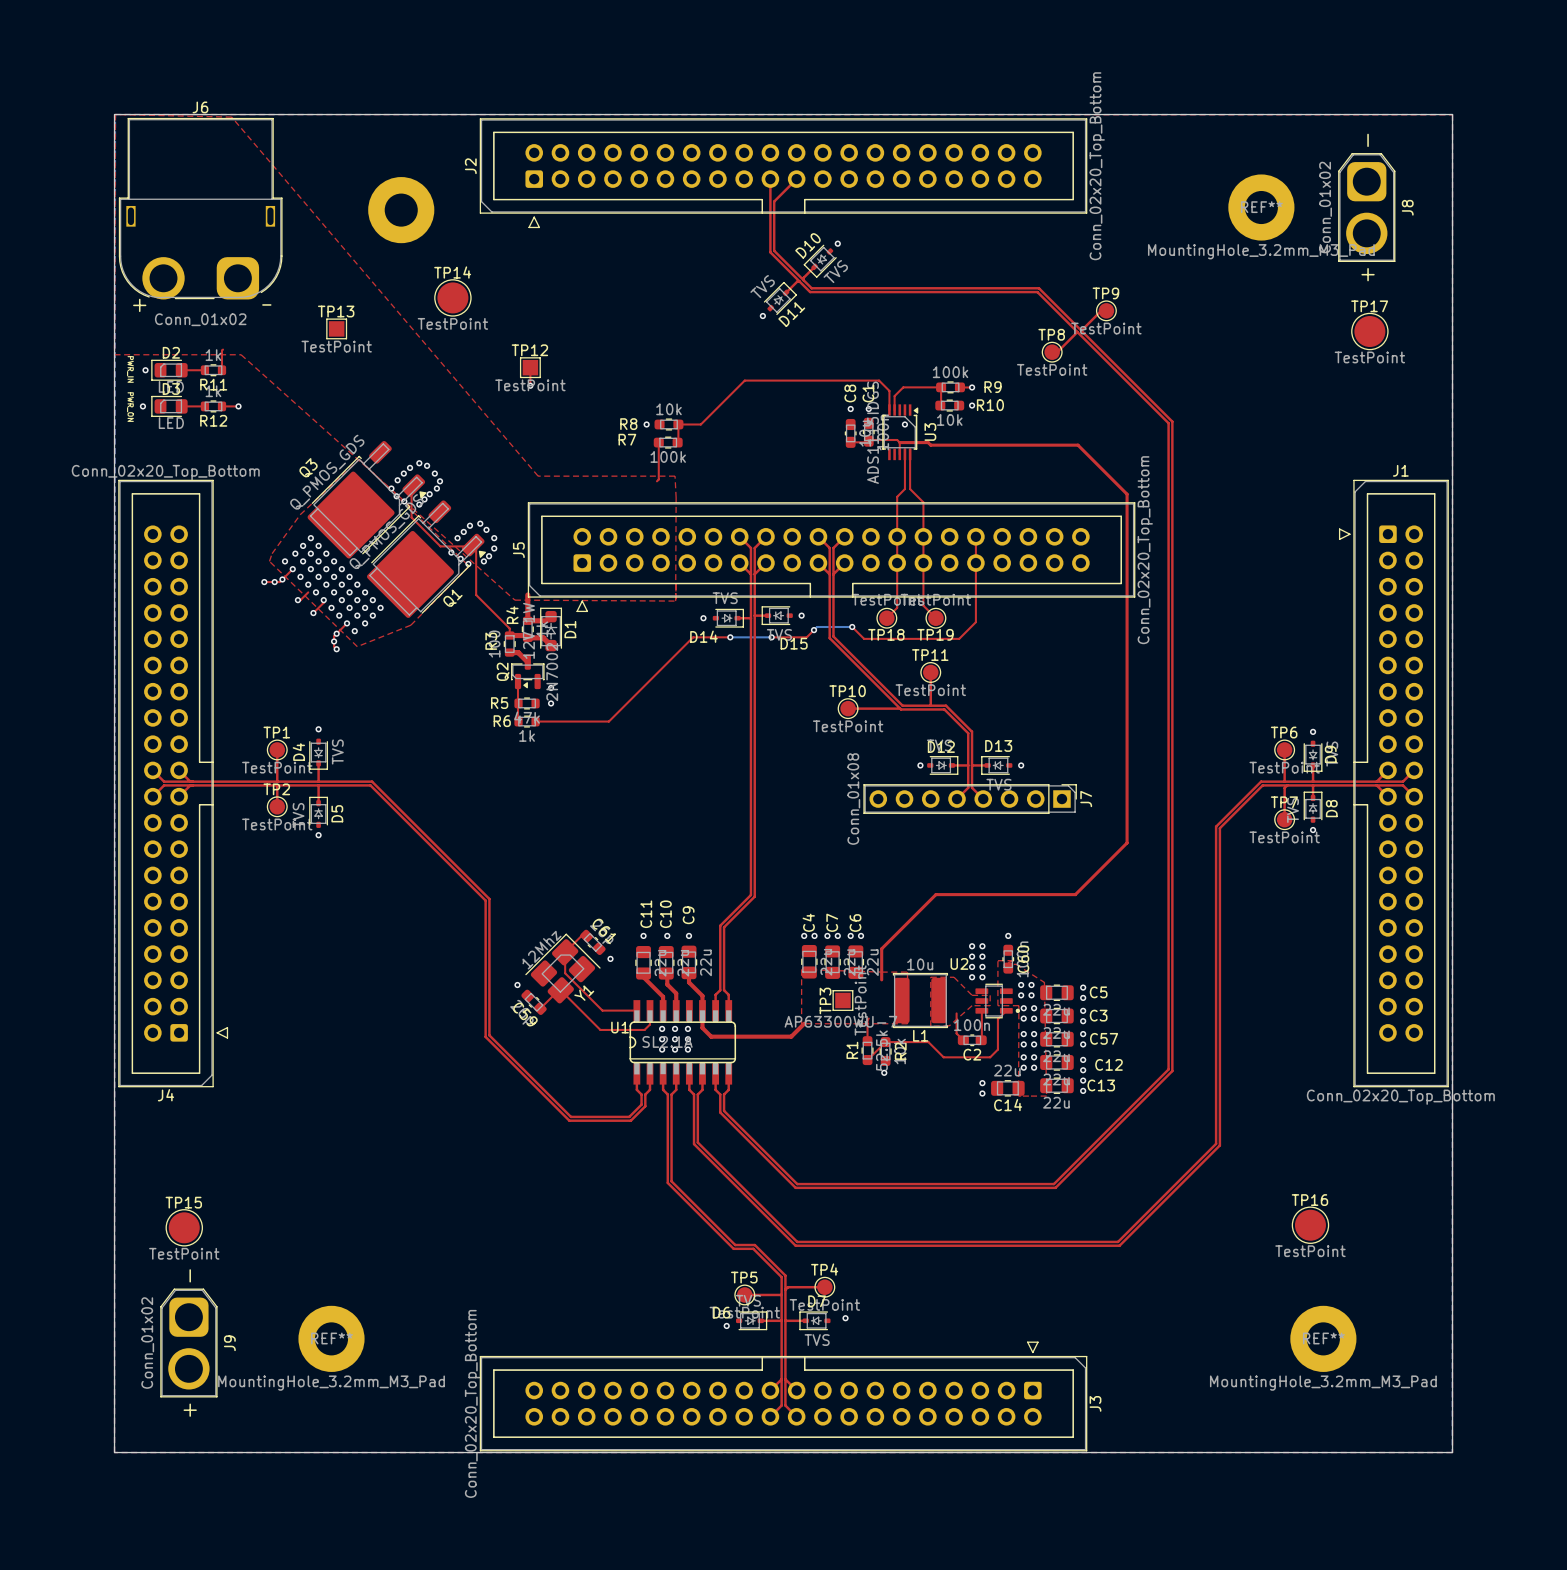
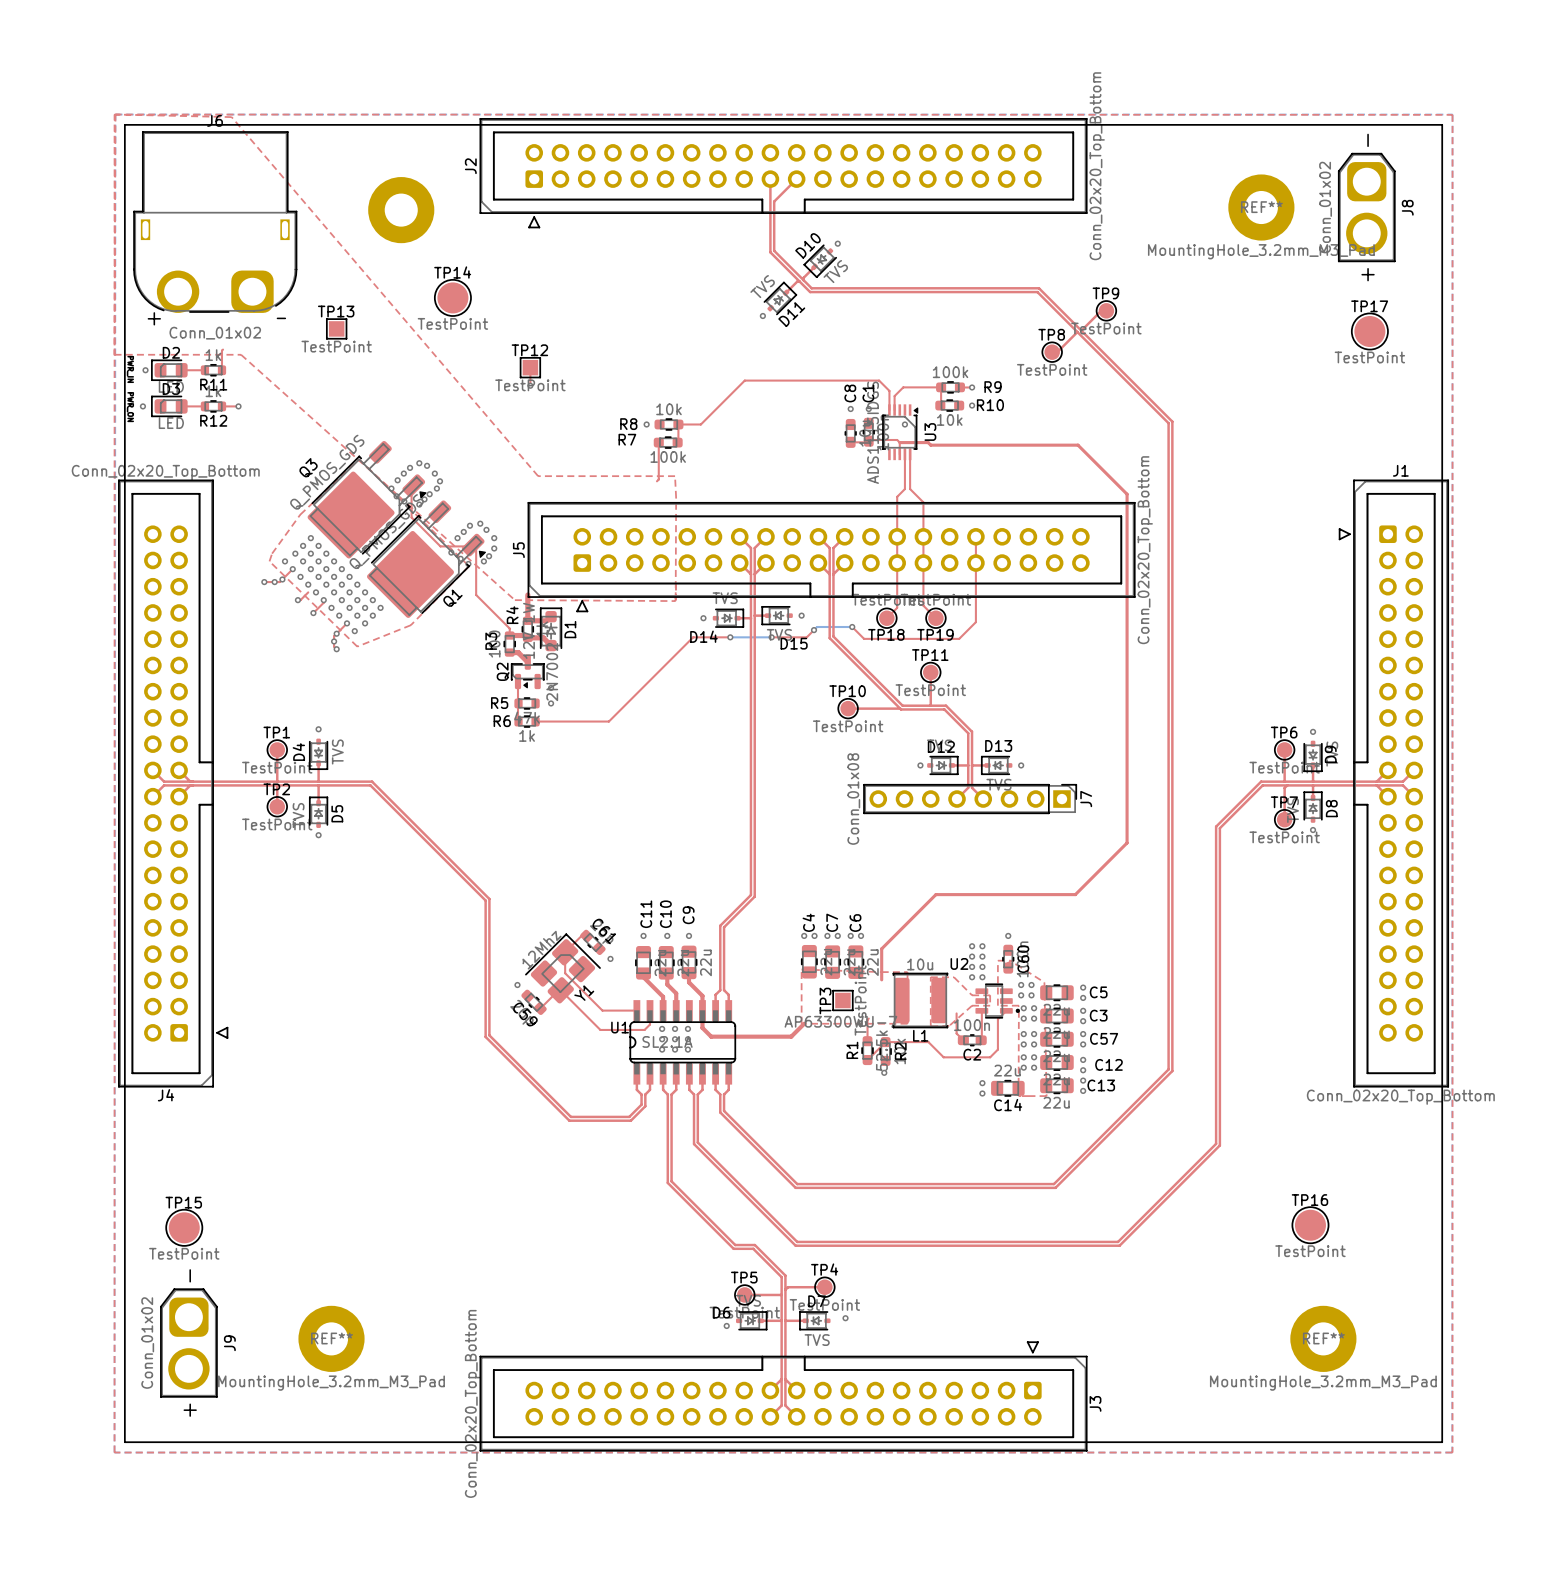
board edge: (114, 114) (1452, 114) (1452, 1452) (114, 1452) (114, 114) -> (124, 124) (124, 1442) (1442, 1442) (1442, 124) (124, 124)
J6 position: (200, 208) -> (215, 222)

